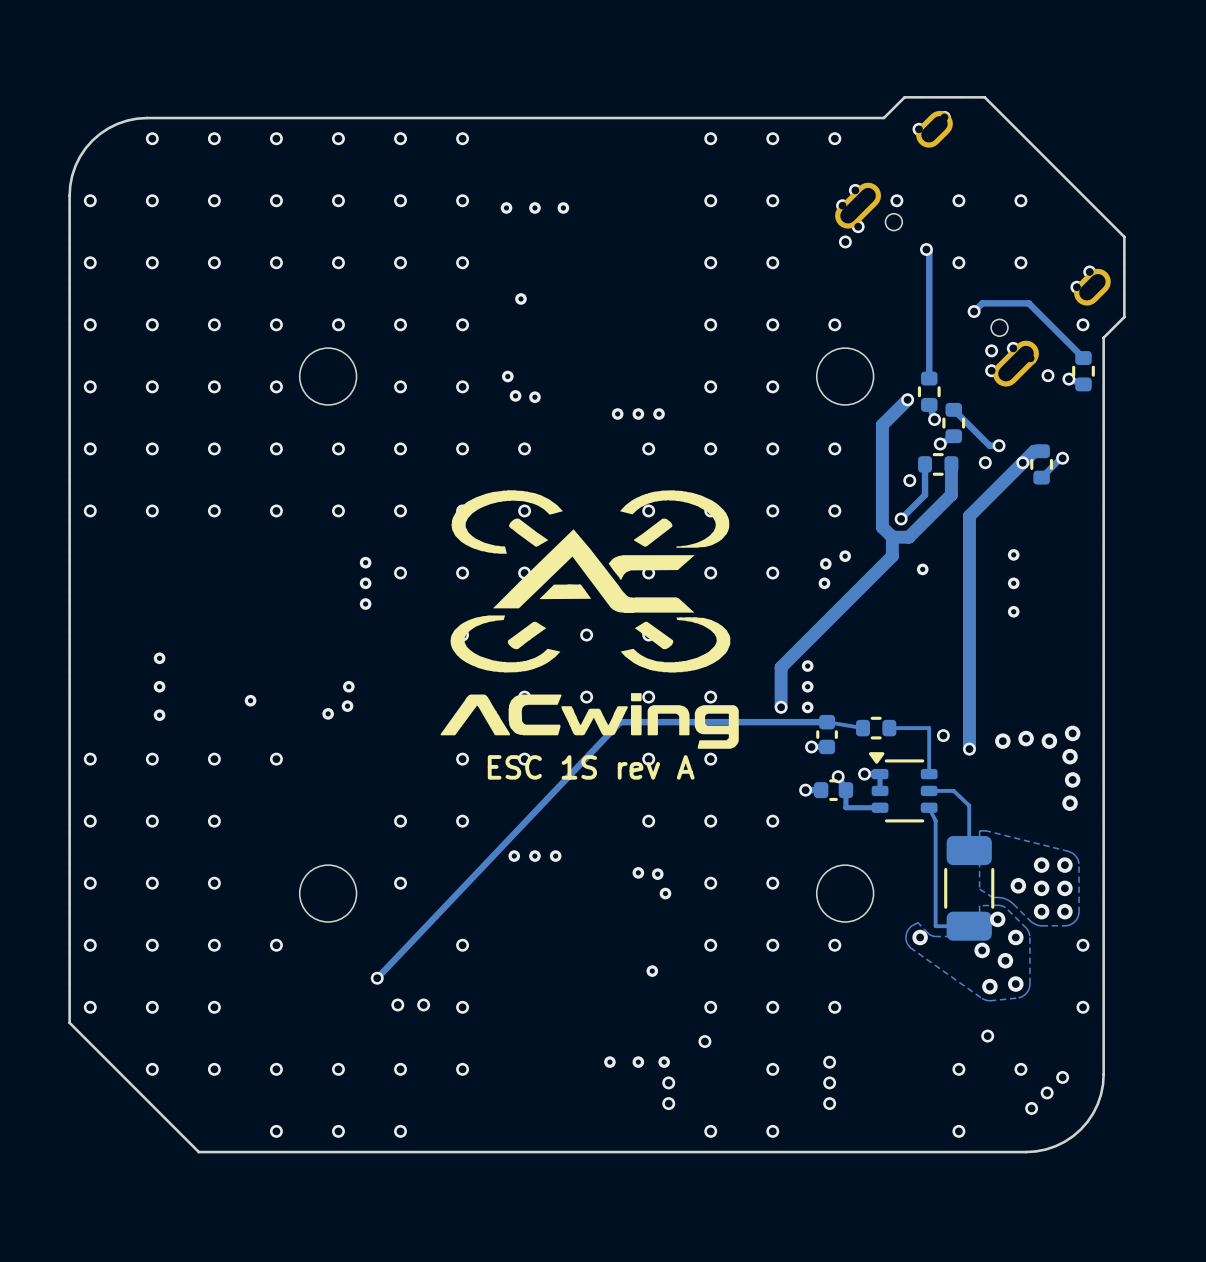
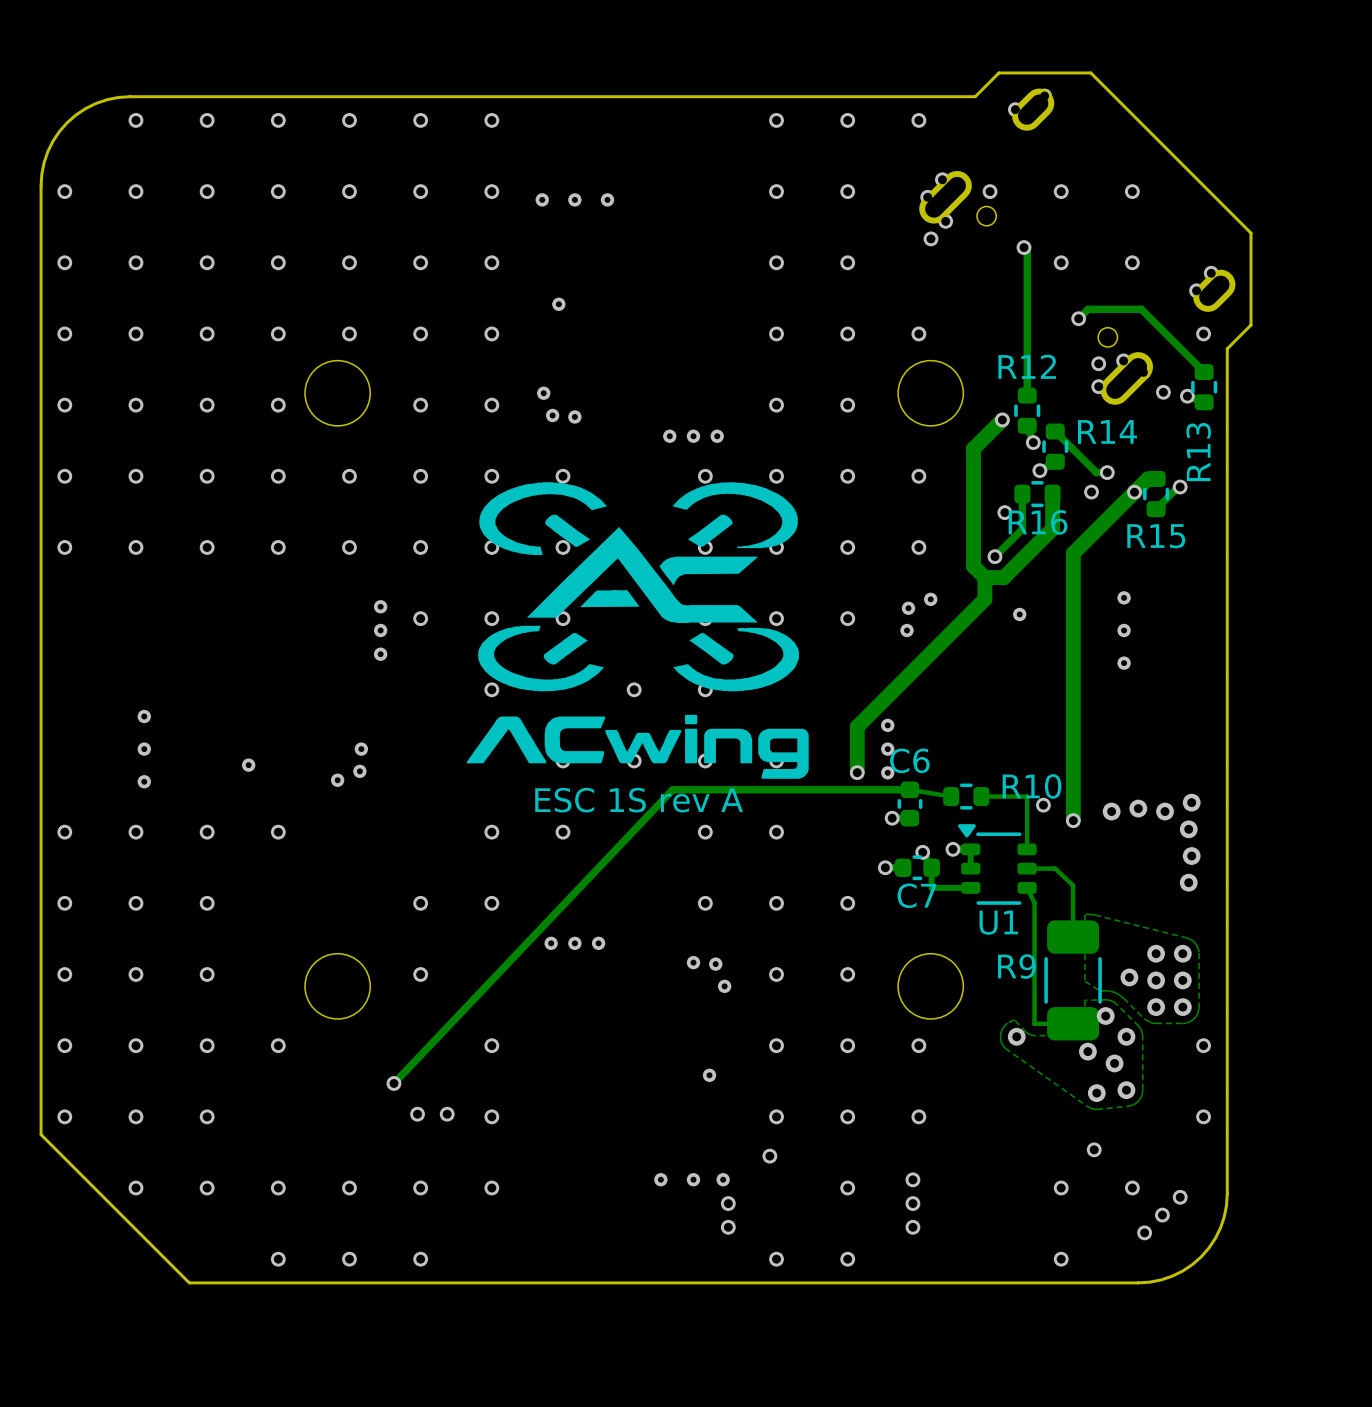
R12 name: none -> R12 (1027, 366)
R14 name: none -> R14 (1107, 431)
R13 name: none -> R13 (1198, 452)
R16 name: none -> R16 (1038, 522)
R15 name: none -> R15 (1156, 536)
drawing position: (589, 619) -> (637, 630)
C6 name: none -> C6 (909, 760)
R10 name: none -> R10 (1031, 786)
text position: ESC 1S rev A (591, 767) -> ESC 1S rev A (639, 800)
C7 name: none -> C7 (916, 895)
U1 name: none -> U1 (998, 922)
R9 name: none -> R9 (1016, 966)

